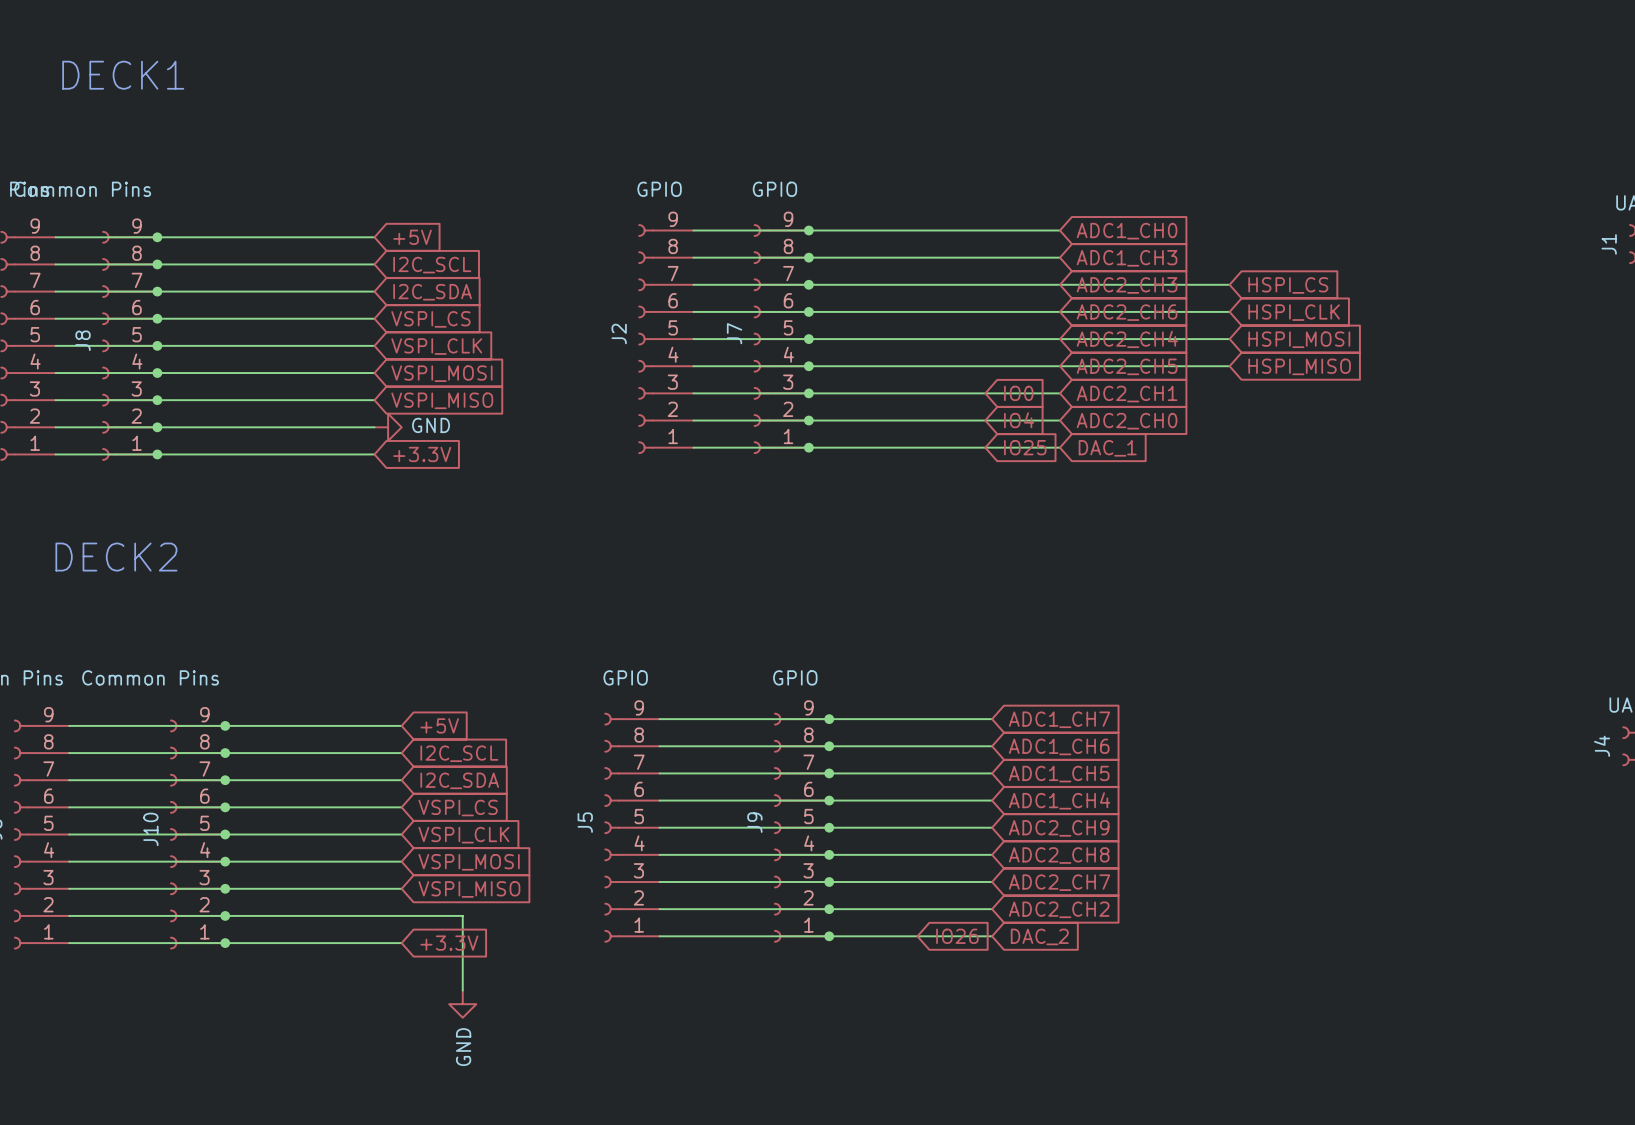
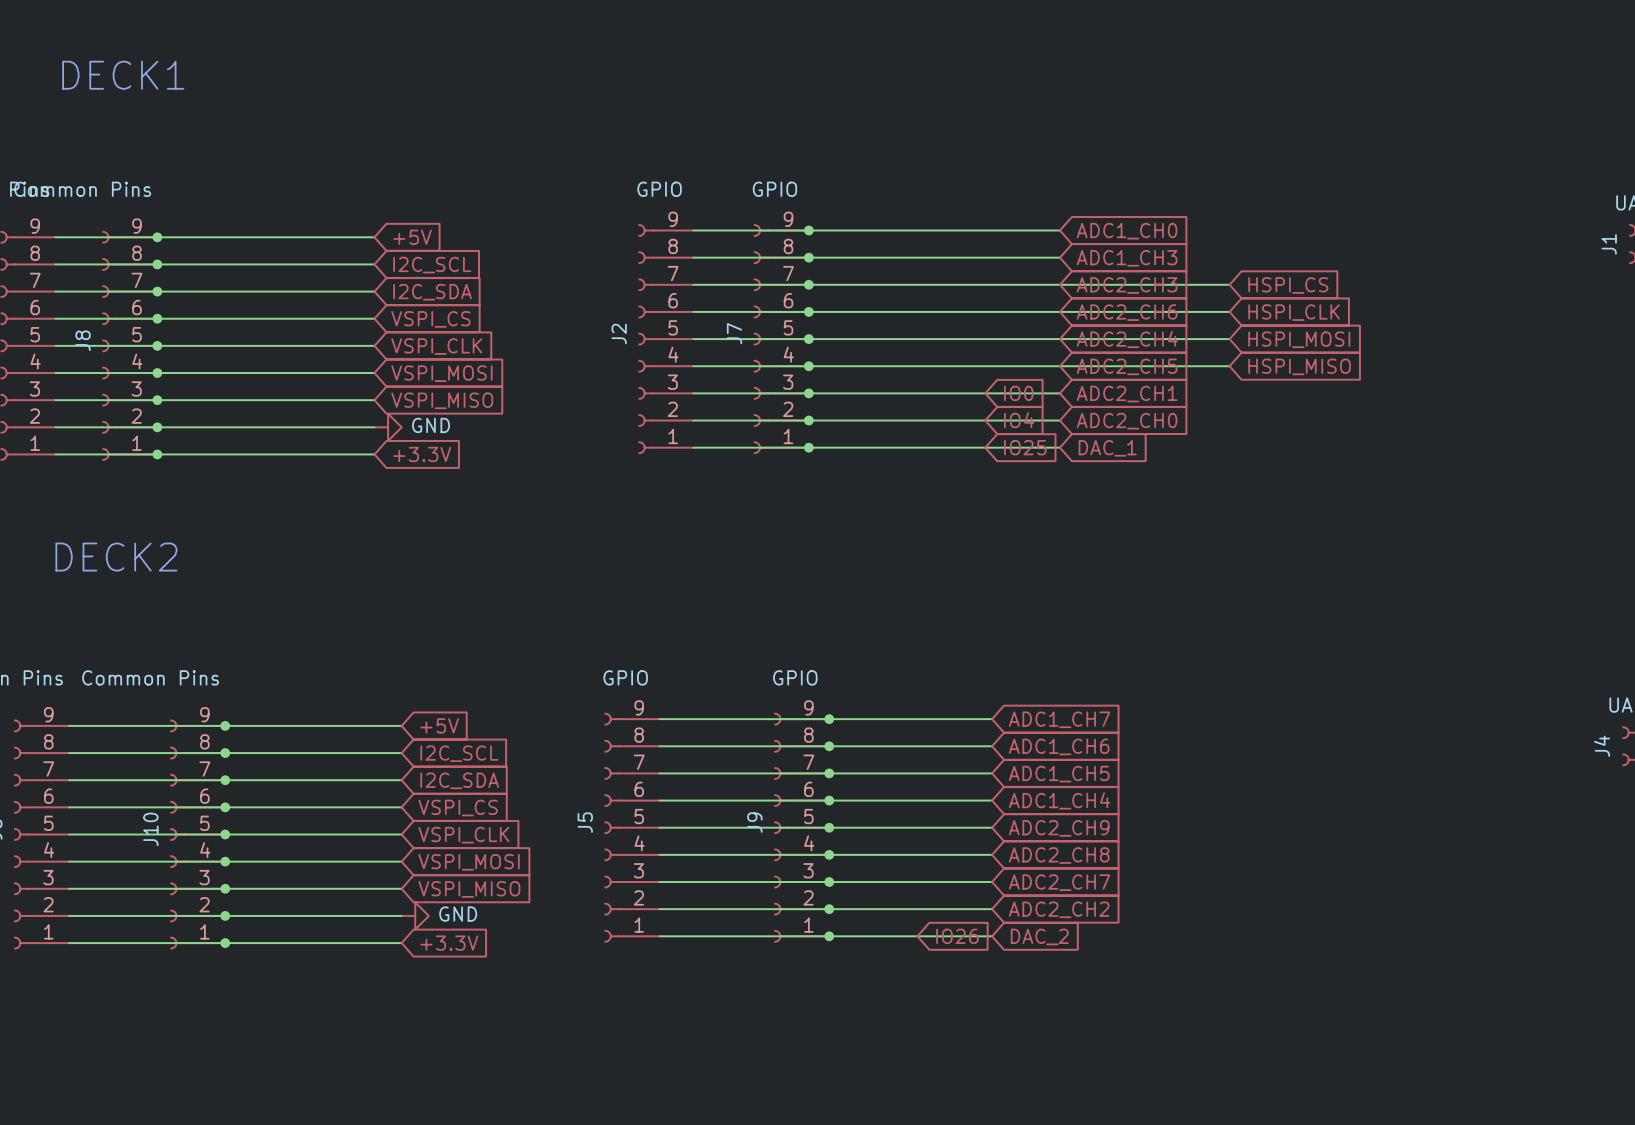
wire: (401, 915) (462, 915) (462, 990) -> none
power symbol rotation: 0° (462, 1004) -> 90° counterclockwise (415, 915)
power symbol position: GND (462, 1004) -> GND (415, 915)

